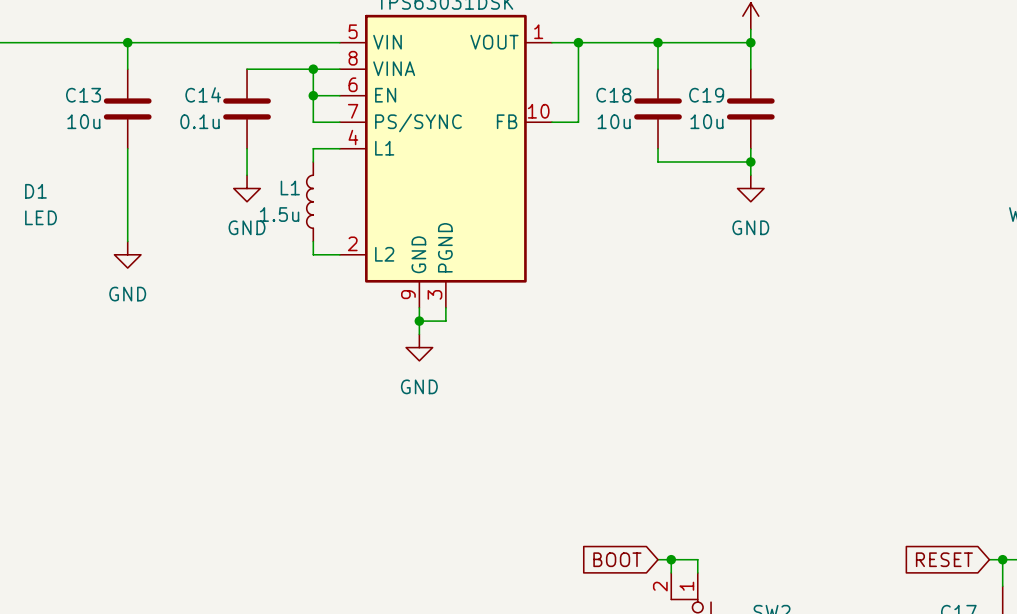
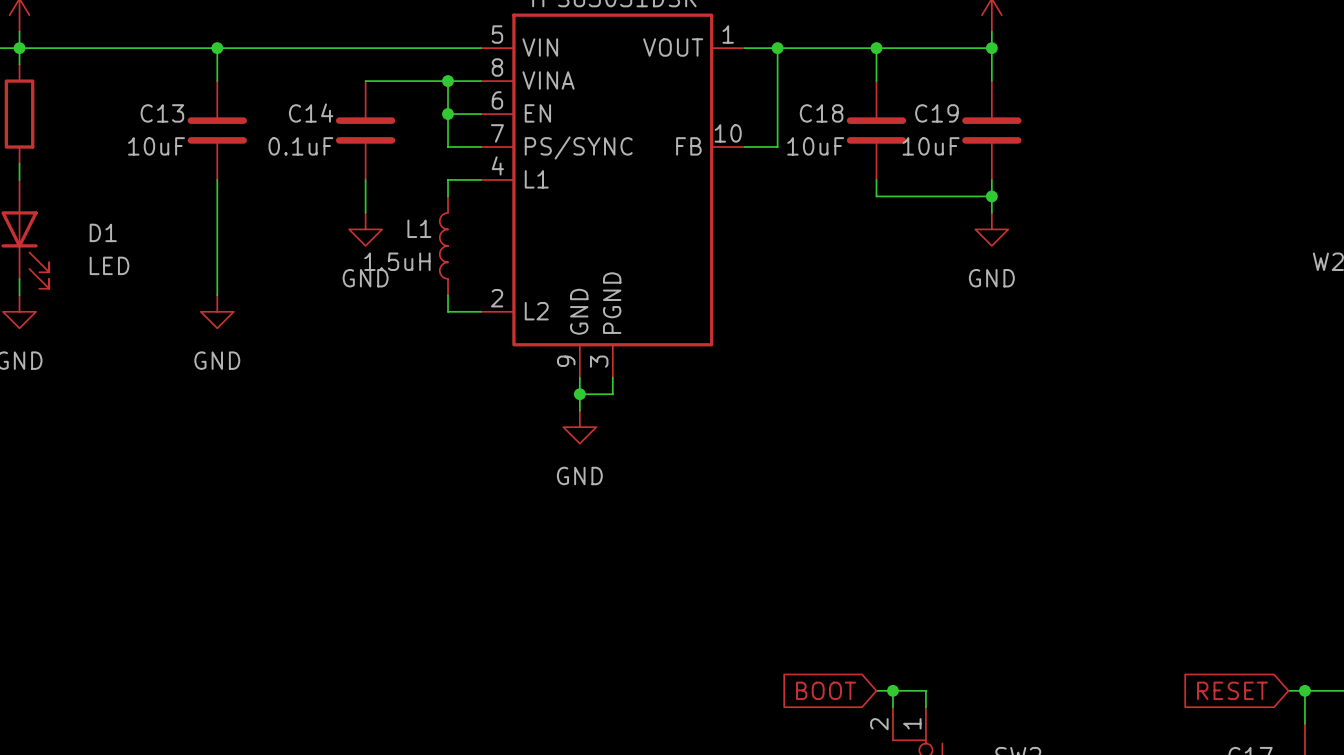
C13 value: 10u (83, 121) -> 10uF (156, 146)
C14 value: 0.1u (200, 121) -> 0.1uF (300, 146)
C18 value: 10u (614, 121) -> 10uF (815, 146)
C19 value: 10u (706, 121) -> 10uF (931, 146)
L1 value: 1.5u (279, 214) -> 1.5uH (397, 261)

